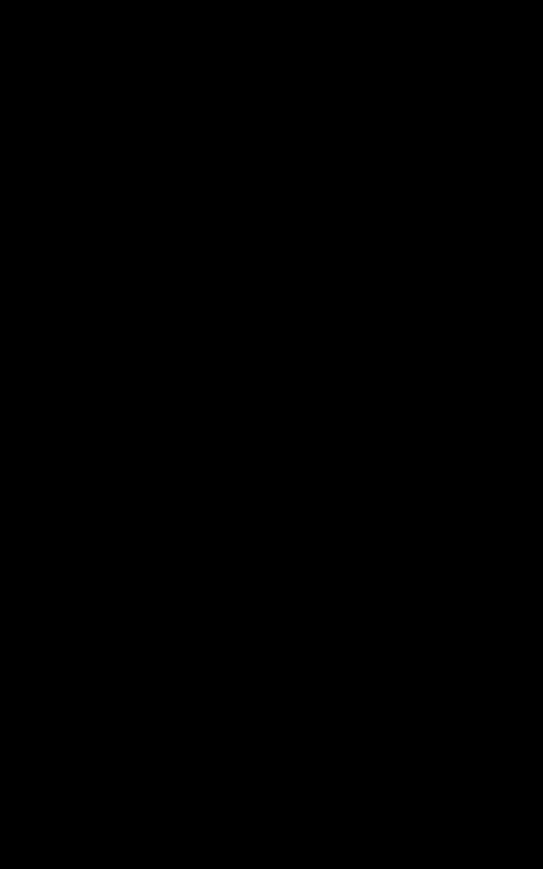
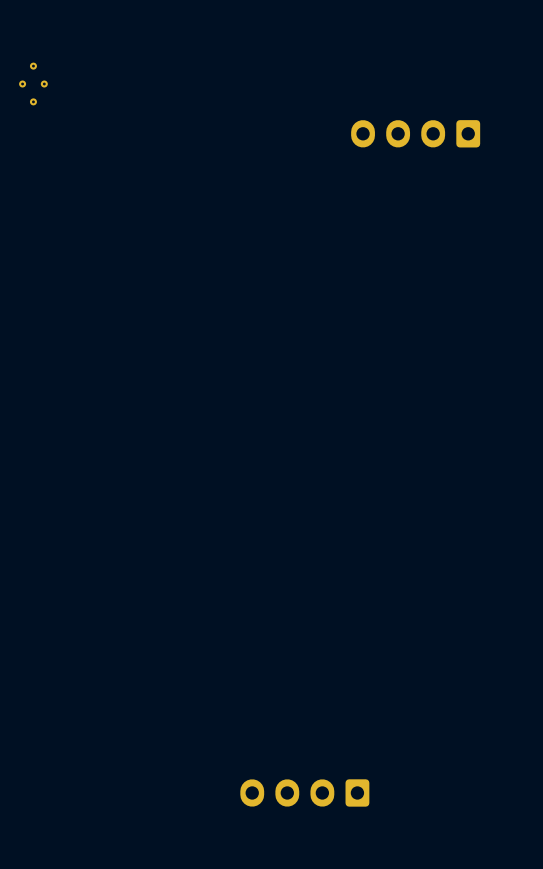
part: none -> (33, 84)
part: none -> (415, 133)
part: none -> (304, 792)

